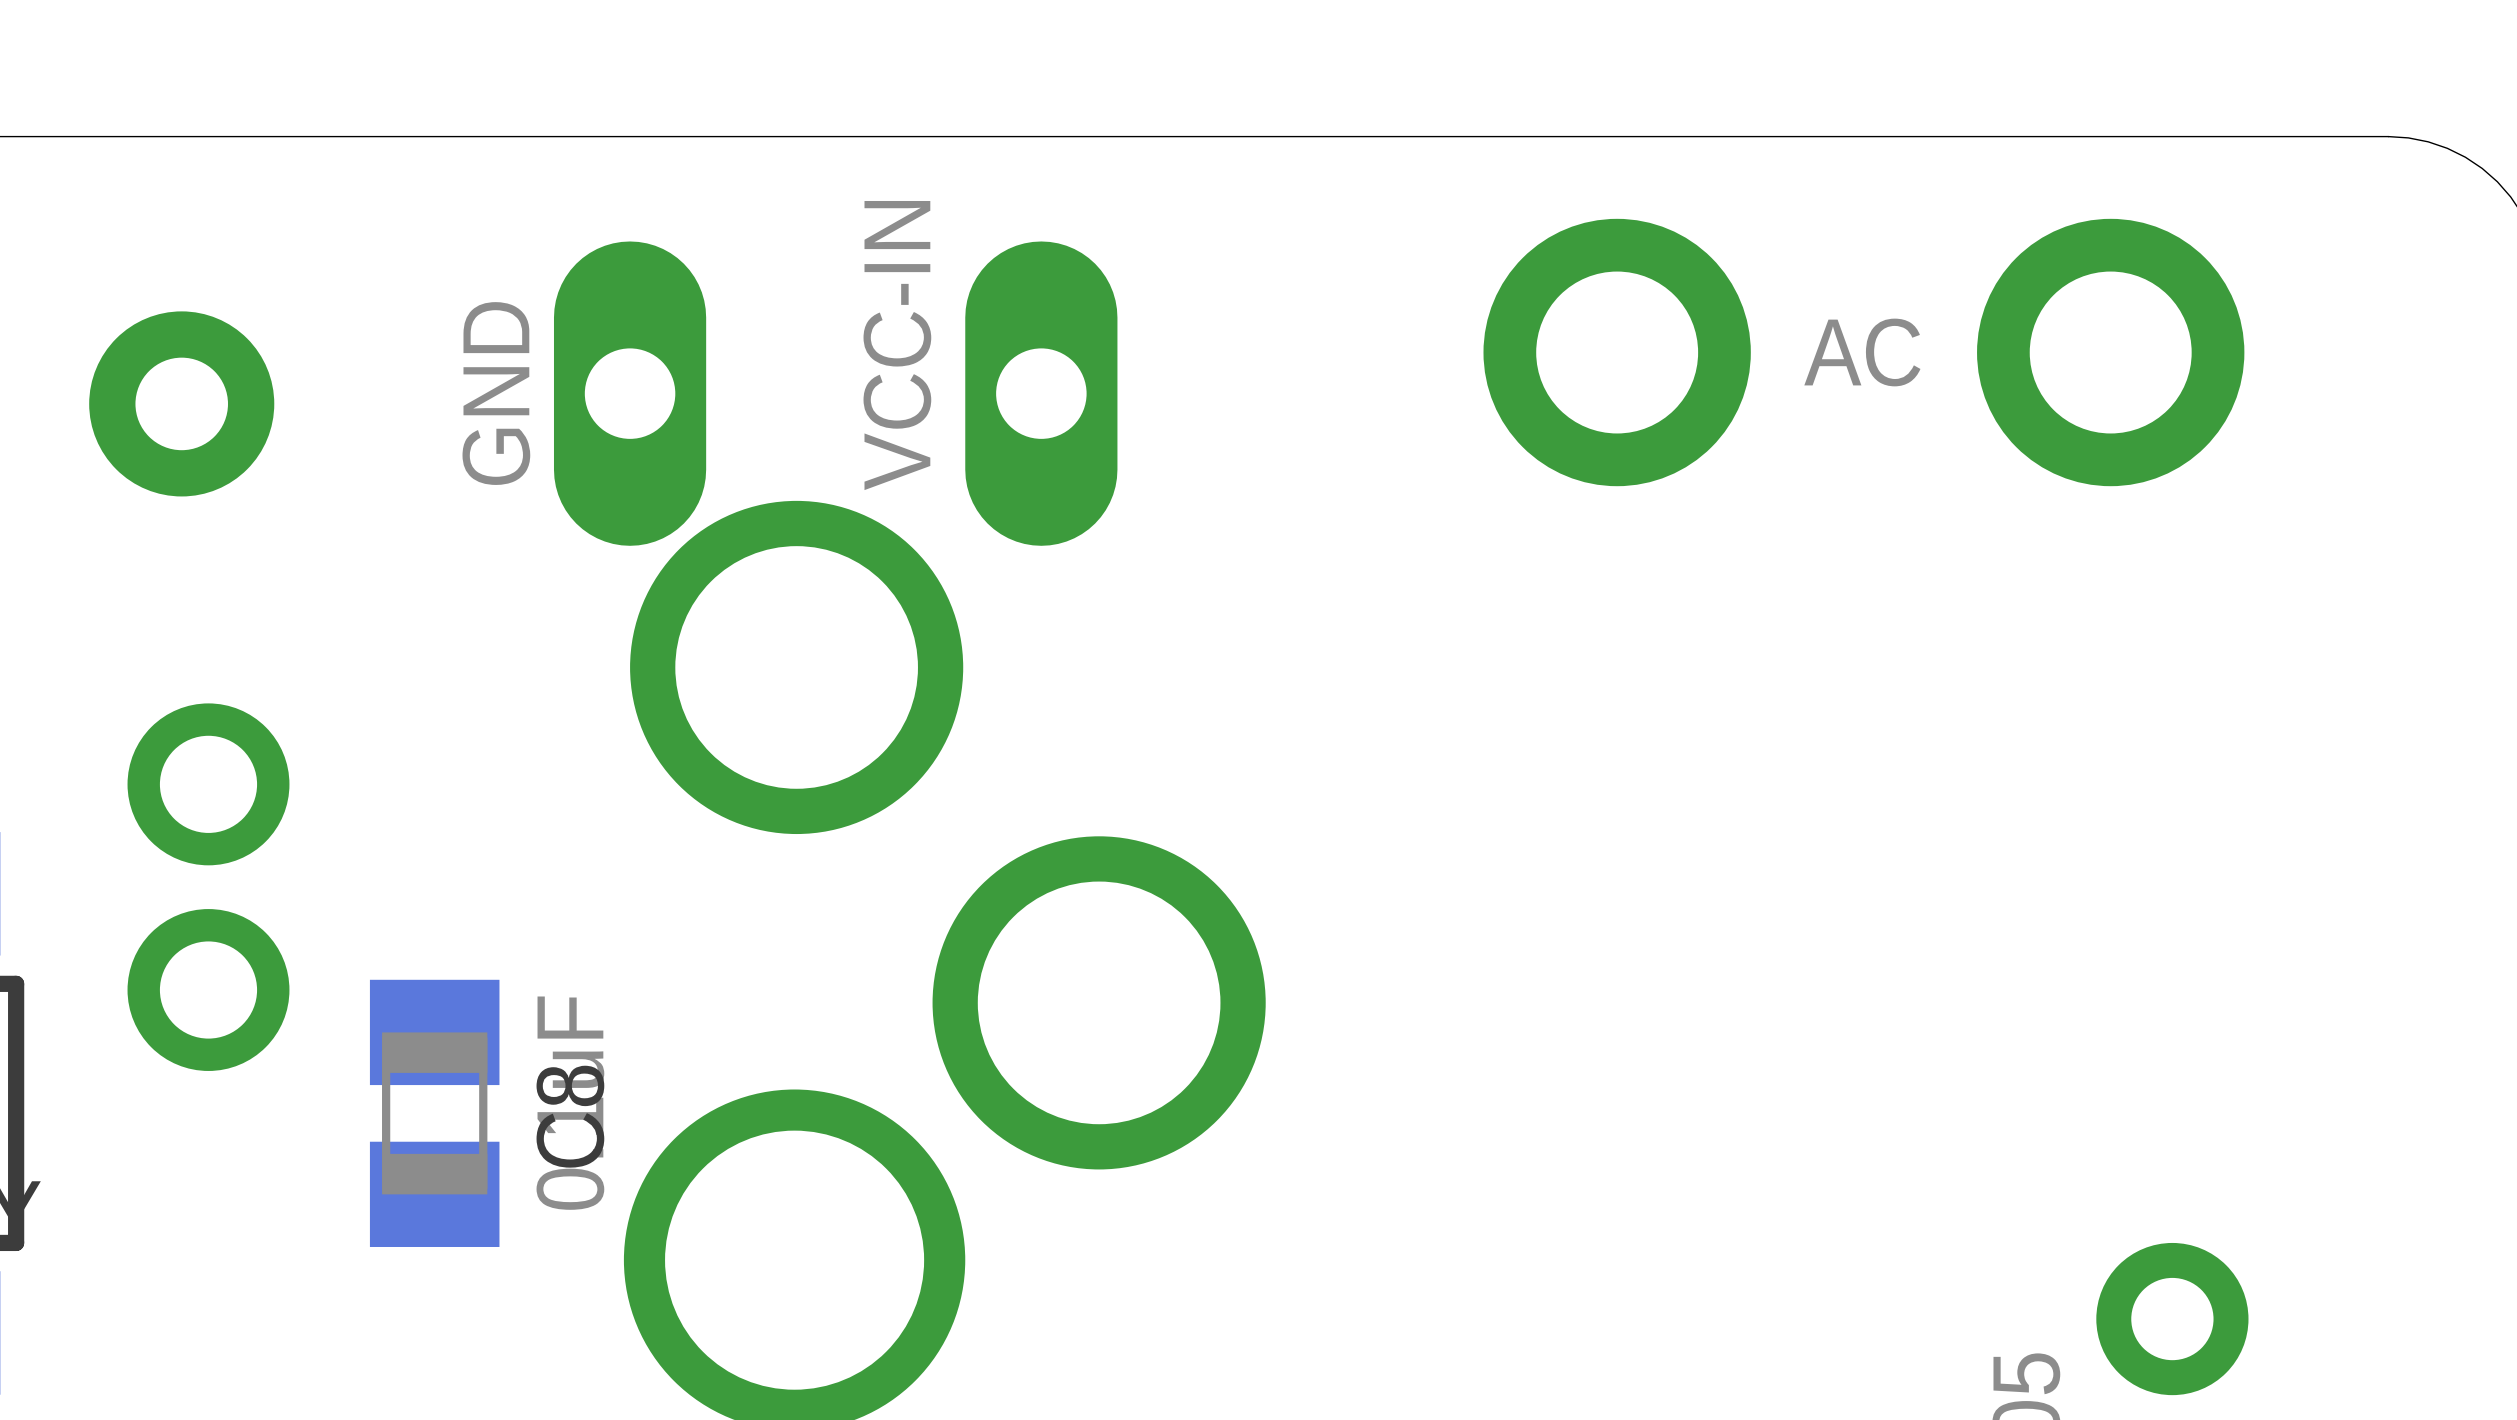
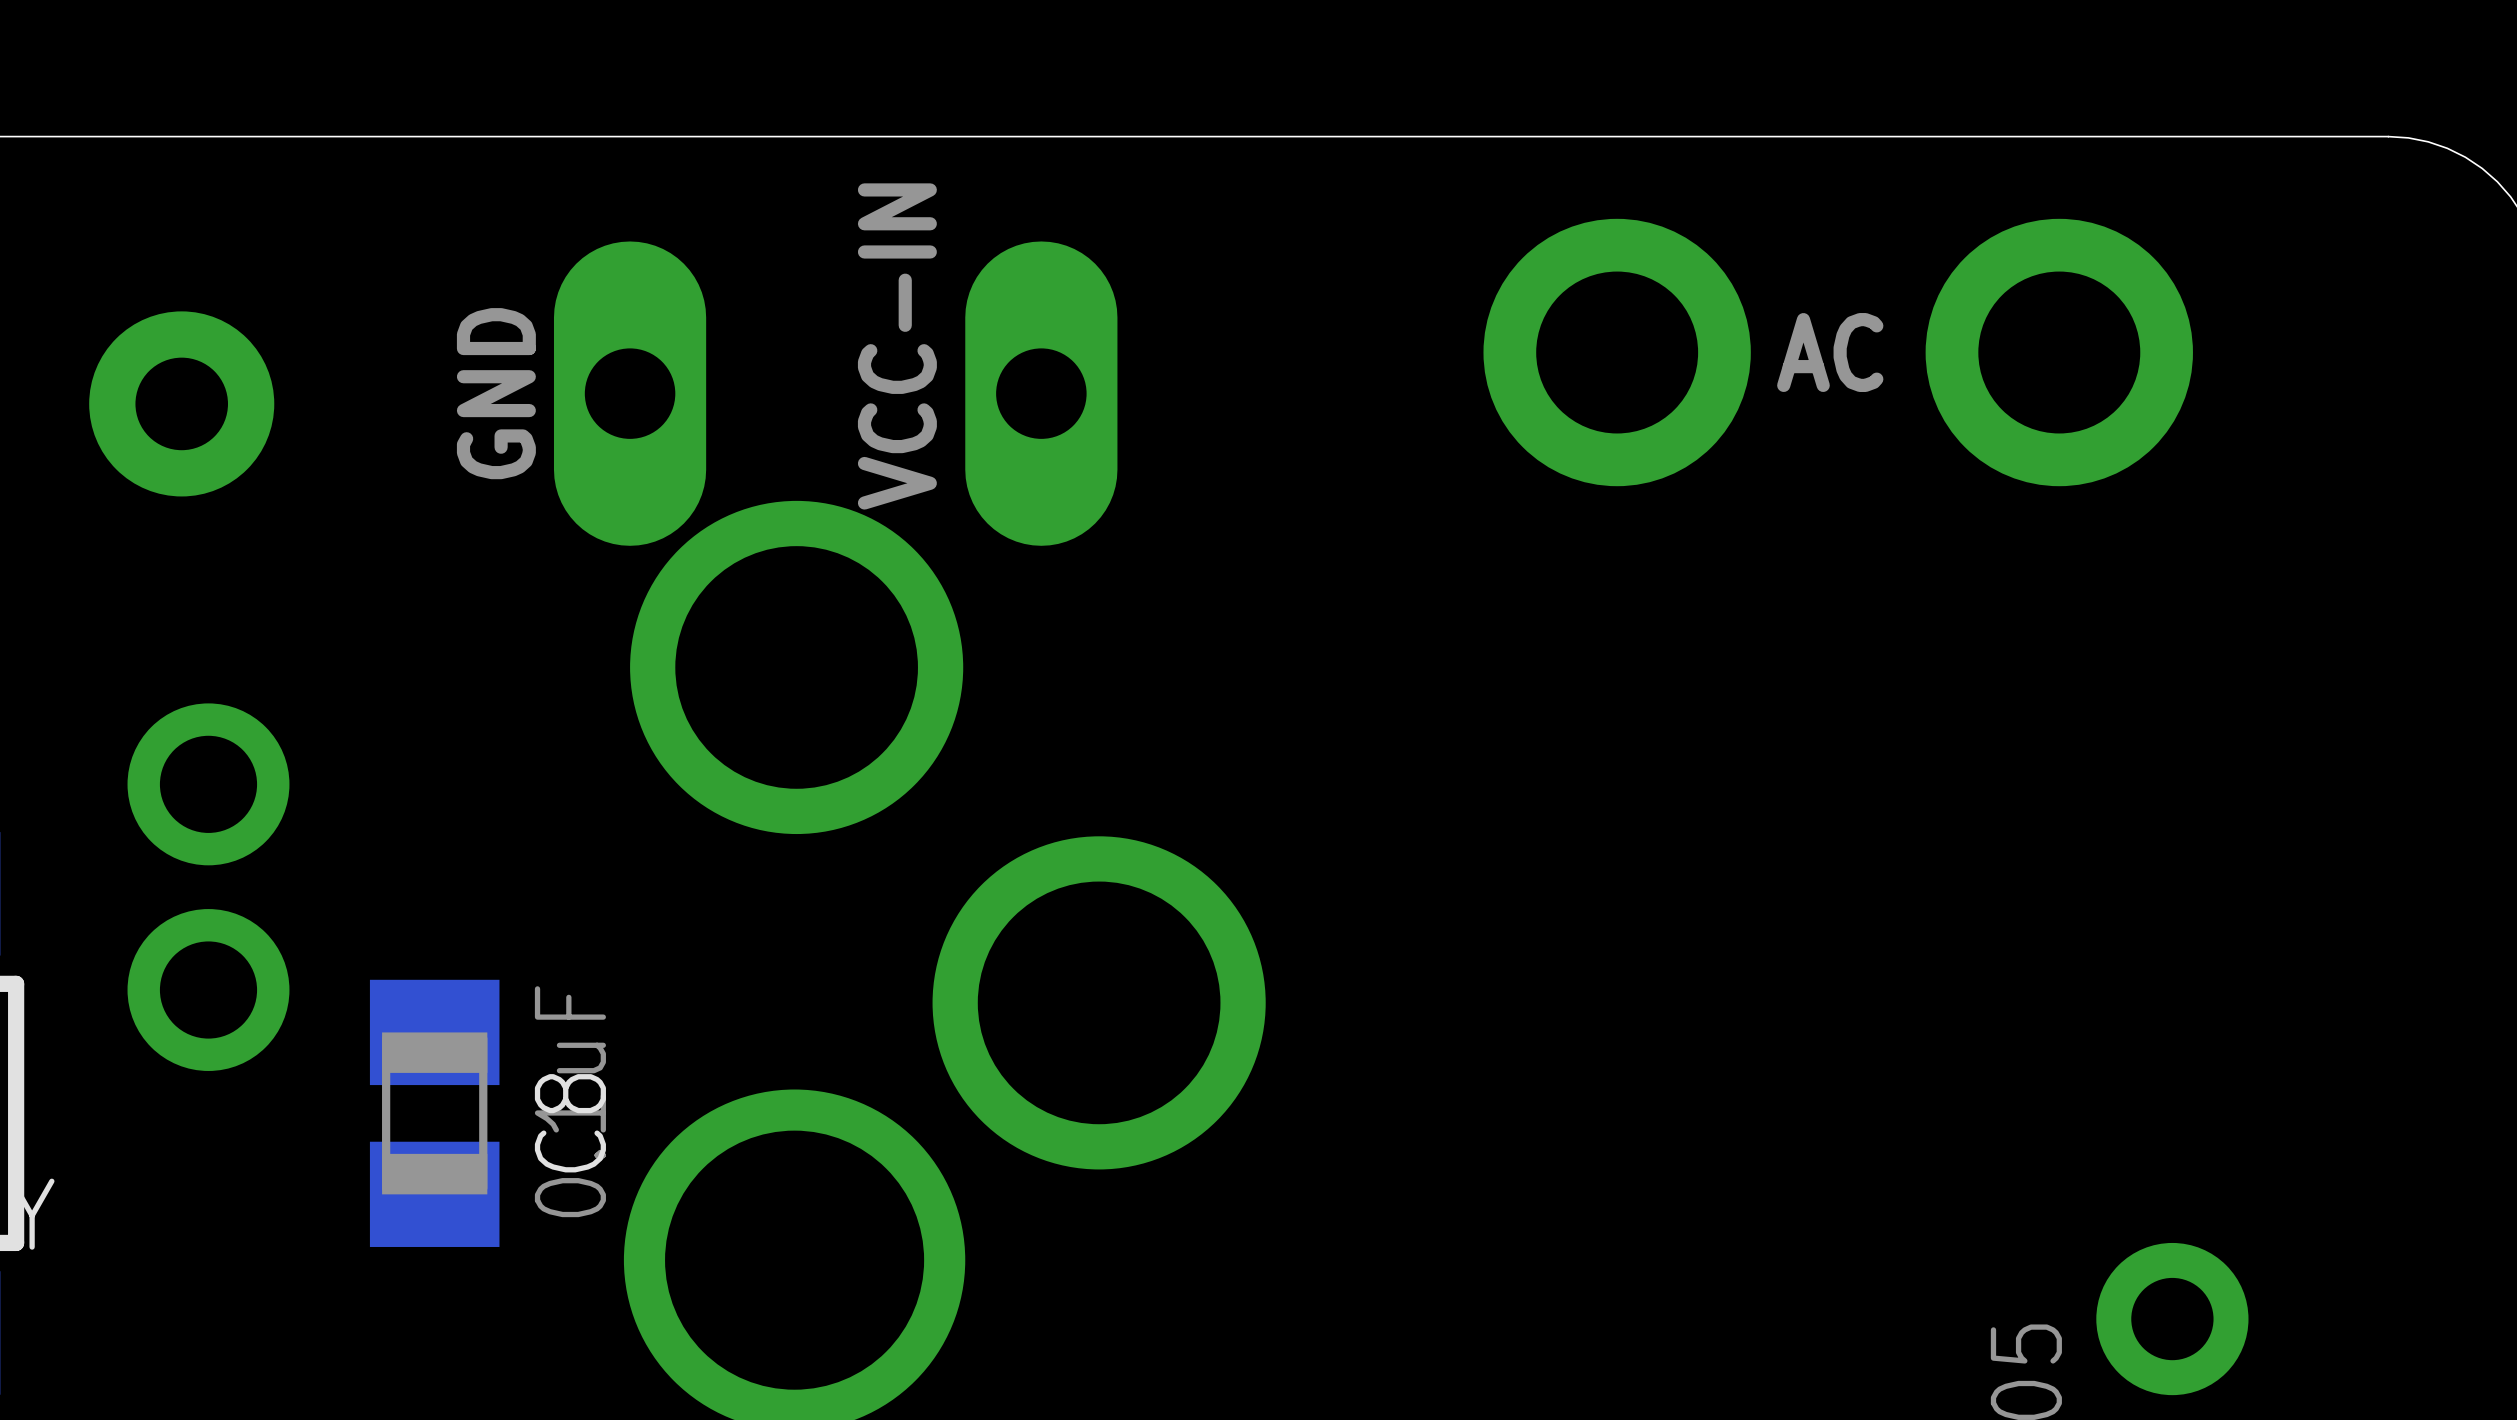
text position: AC (1862, 352) -> AC (1830, 352)
part position: (2110, 352) -> (2059, 352)

